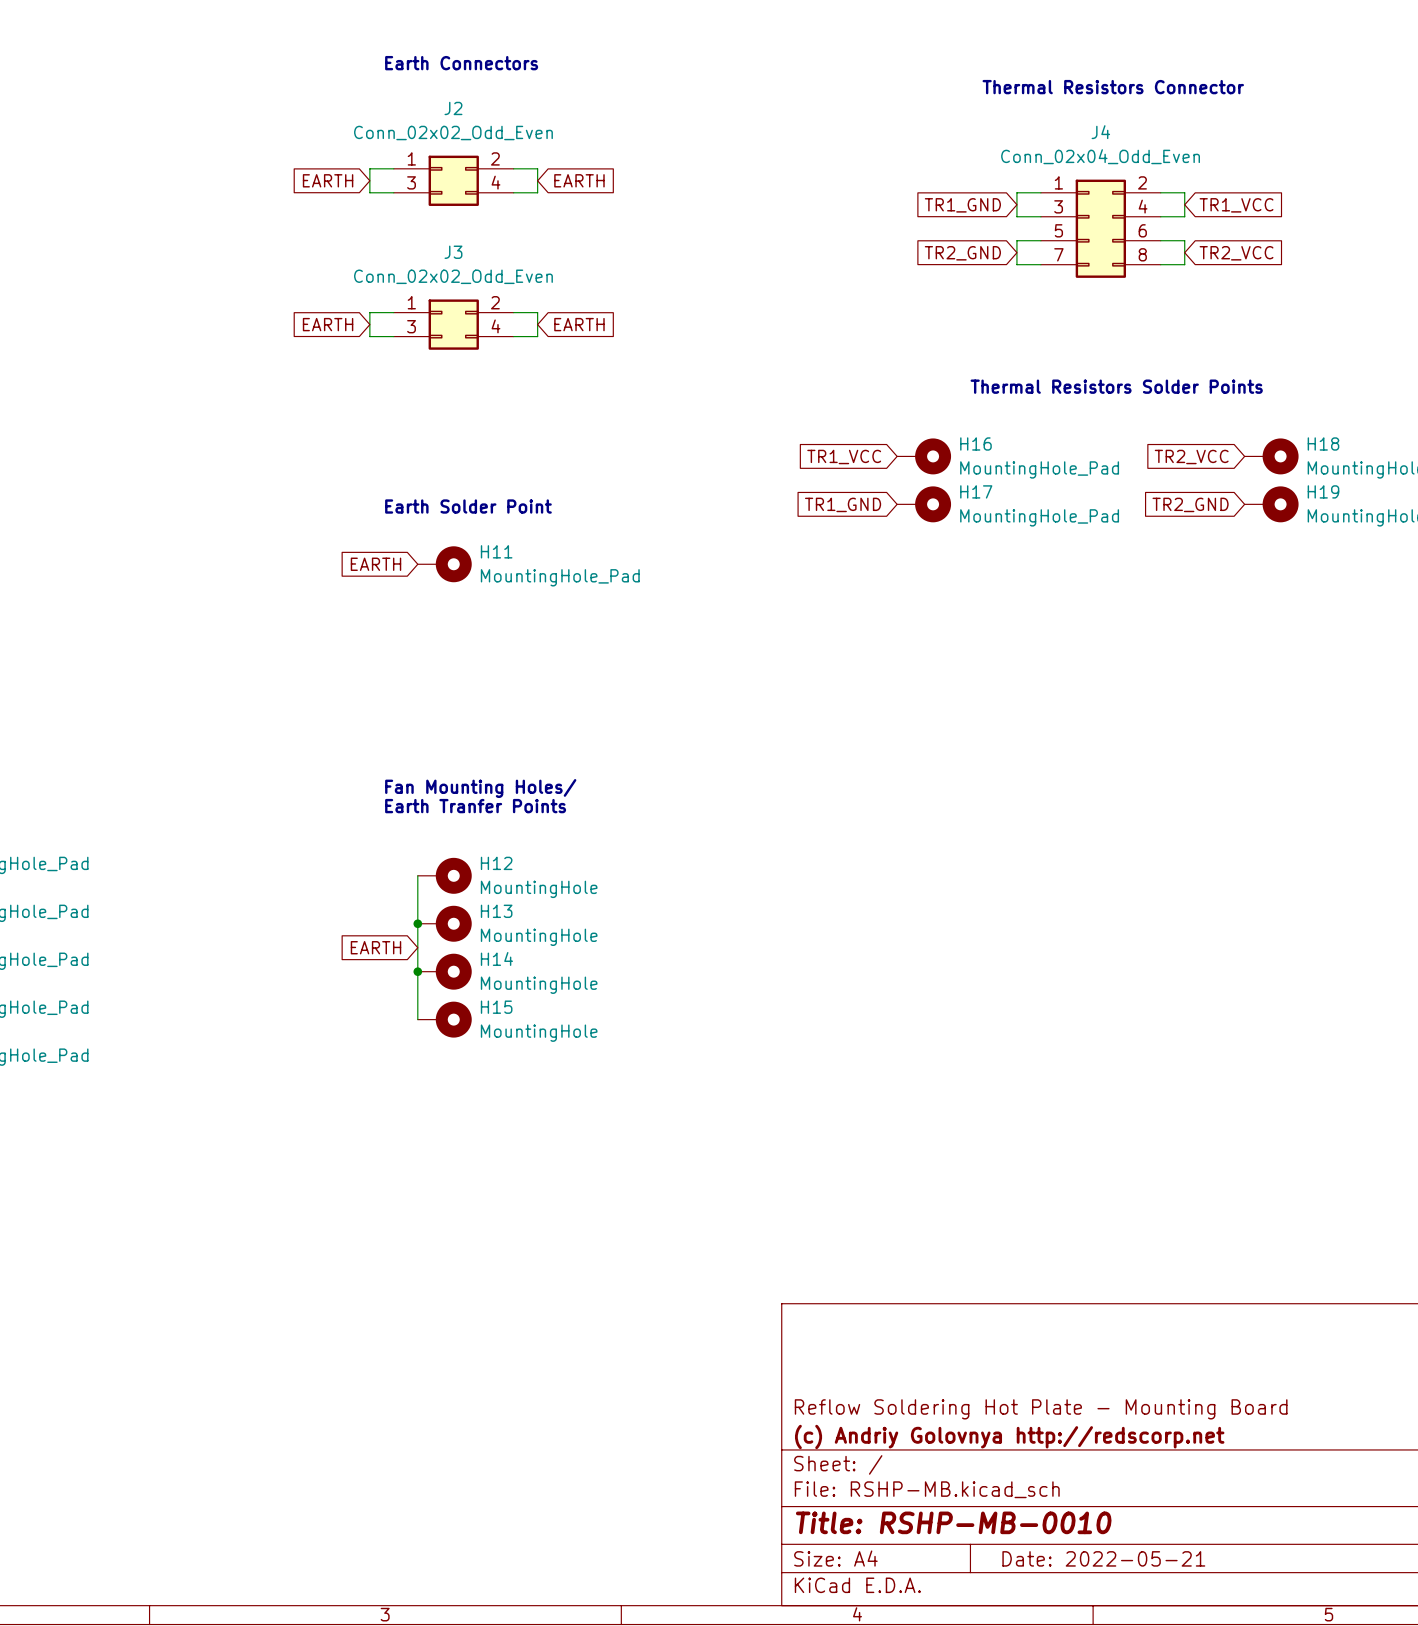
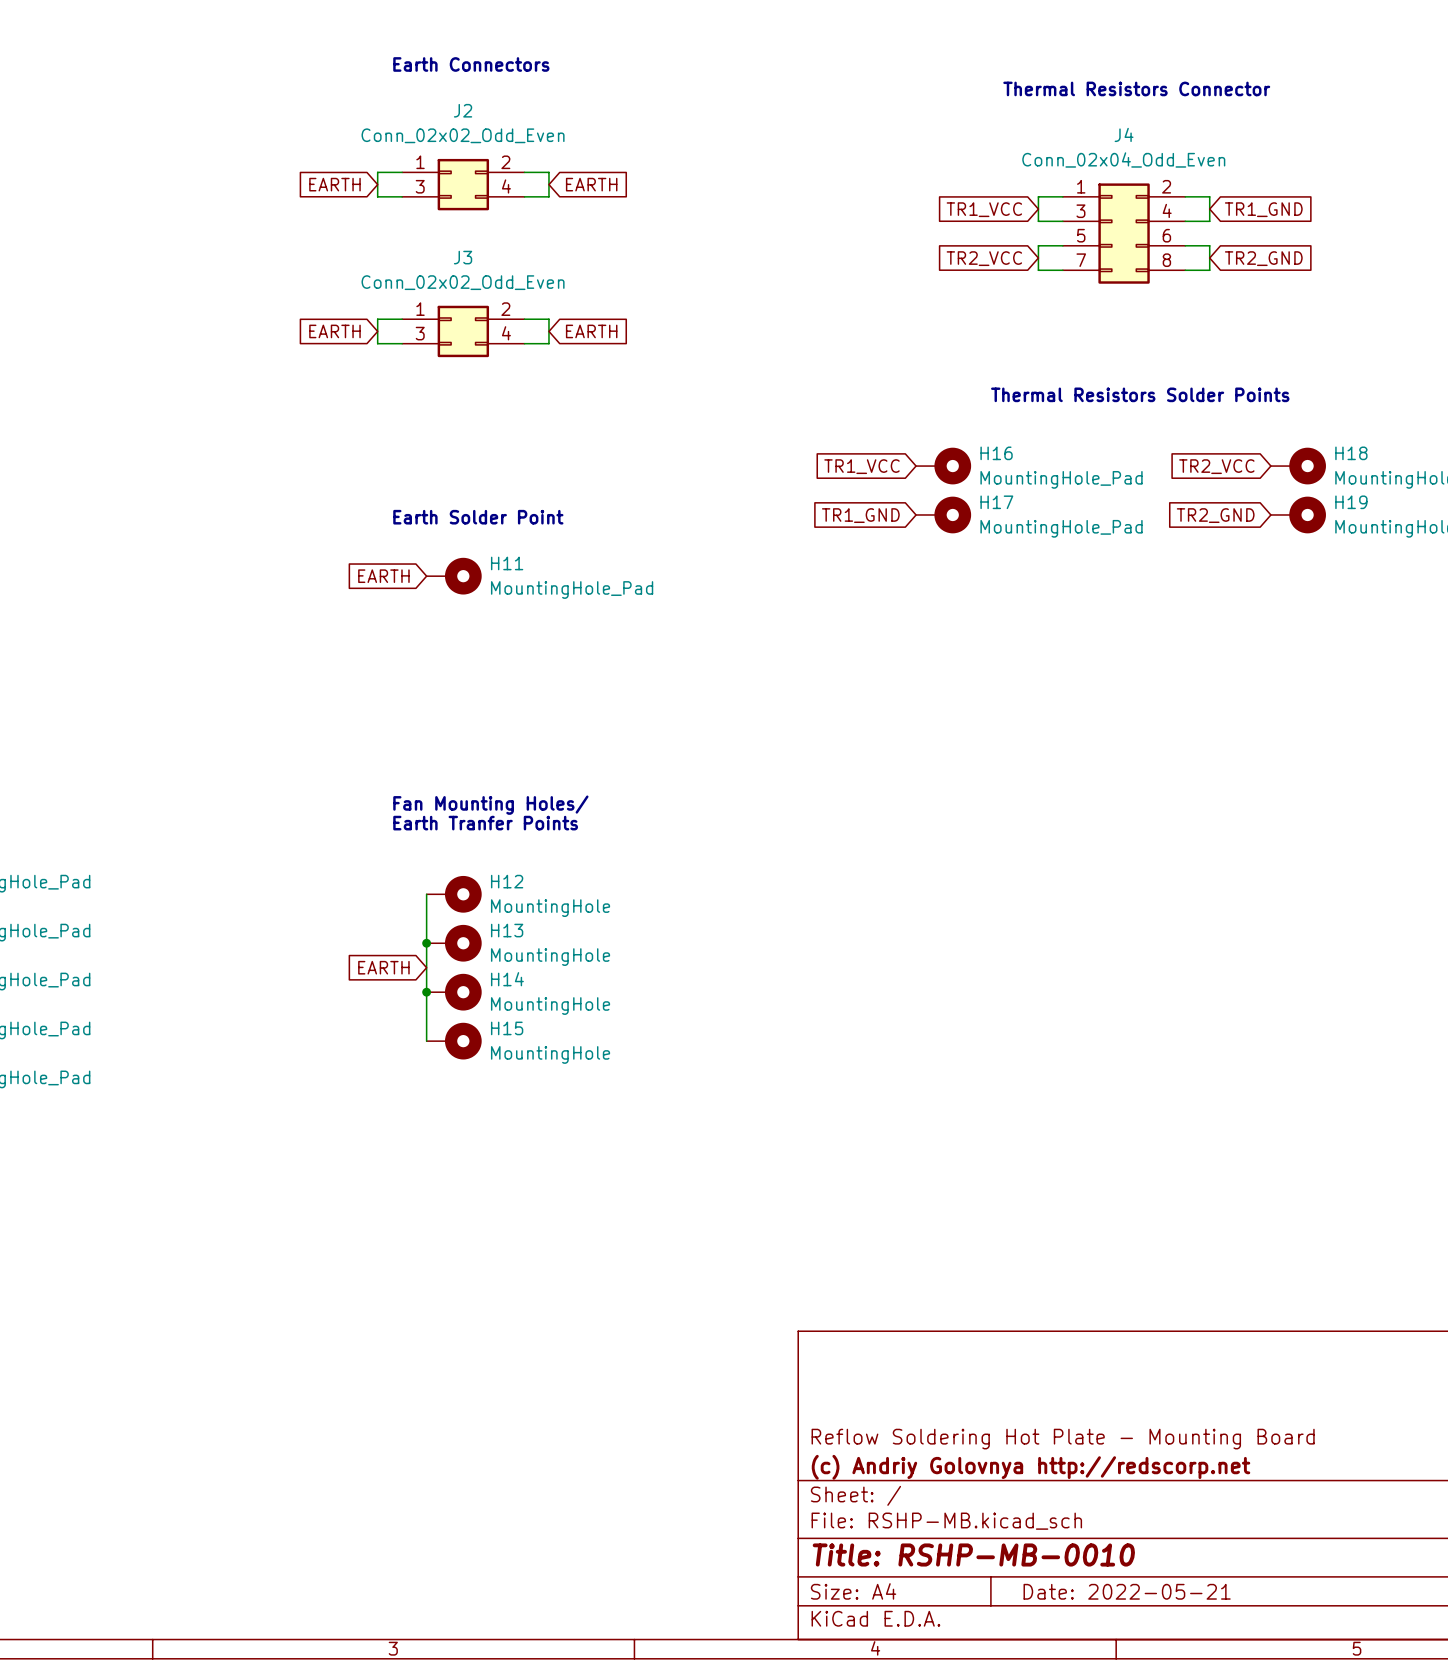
global label: TR1_GND (962, 205) -> TR1_VCC (984, 209)
global label: TR1_VCC (1236, 205) -> TR1_GND (1263, 209)
global label: TR2_GND (962, 253) -> TR2_VCC (984, 258)
global label: TR2_VCC (1236, 253) -> TR2_GND (1263, 258)

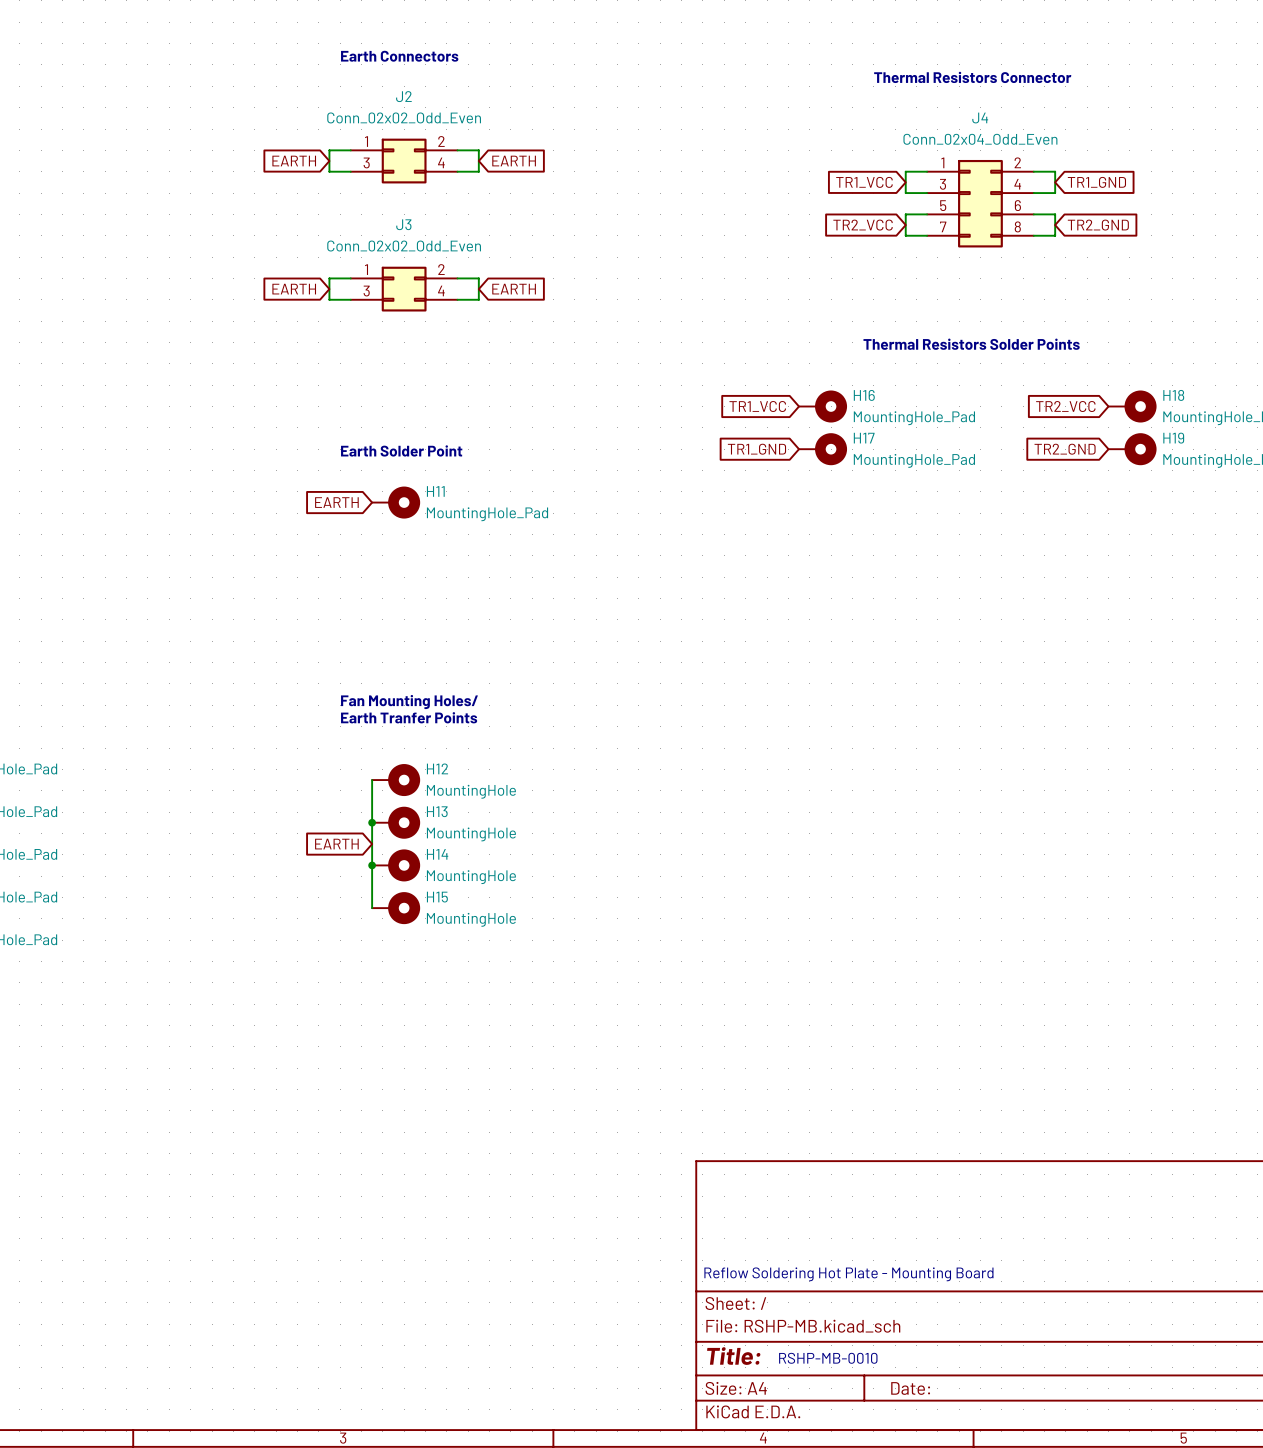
title block: Reflow Soldering Hot Plate - Mounting Board (1063, 1439) -> none
text: none -> Reflow Soldering Hot Plate - Mounting Board (848, 1274)
title block: (c) Andriy Golovnya http://redscorp.net (1031, 1467) -> none
title block: Title: RSHP-MB-0010 (973, 1554) -> Title: (733, 1356)
text: none -> RSHP-MB-0010 (828, 1358)
title block: Date: 2022-05-21 (1127, 1591) -> Date: (910, 1388)

